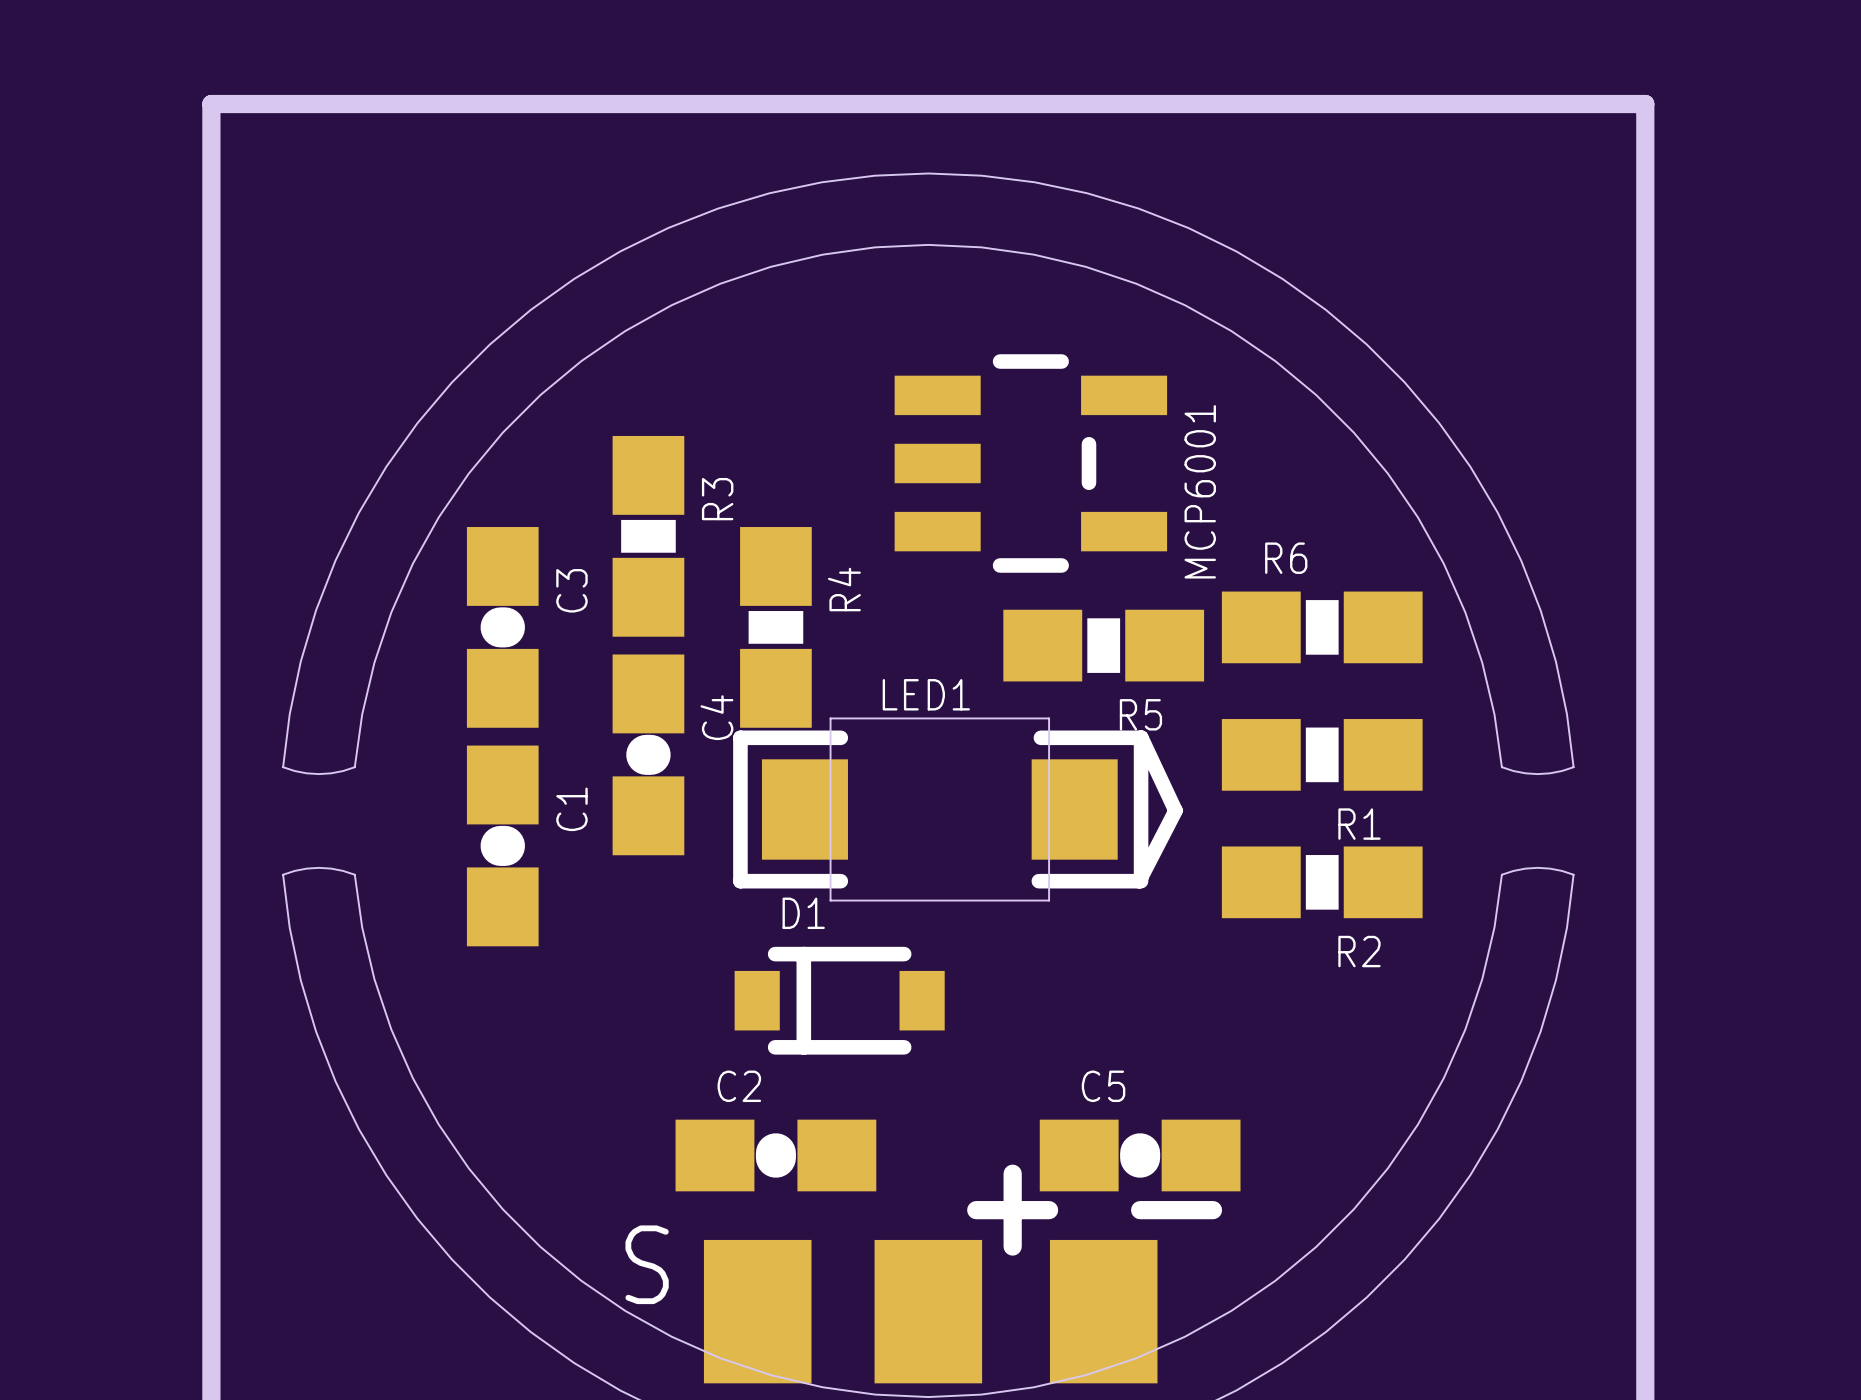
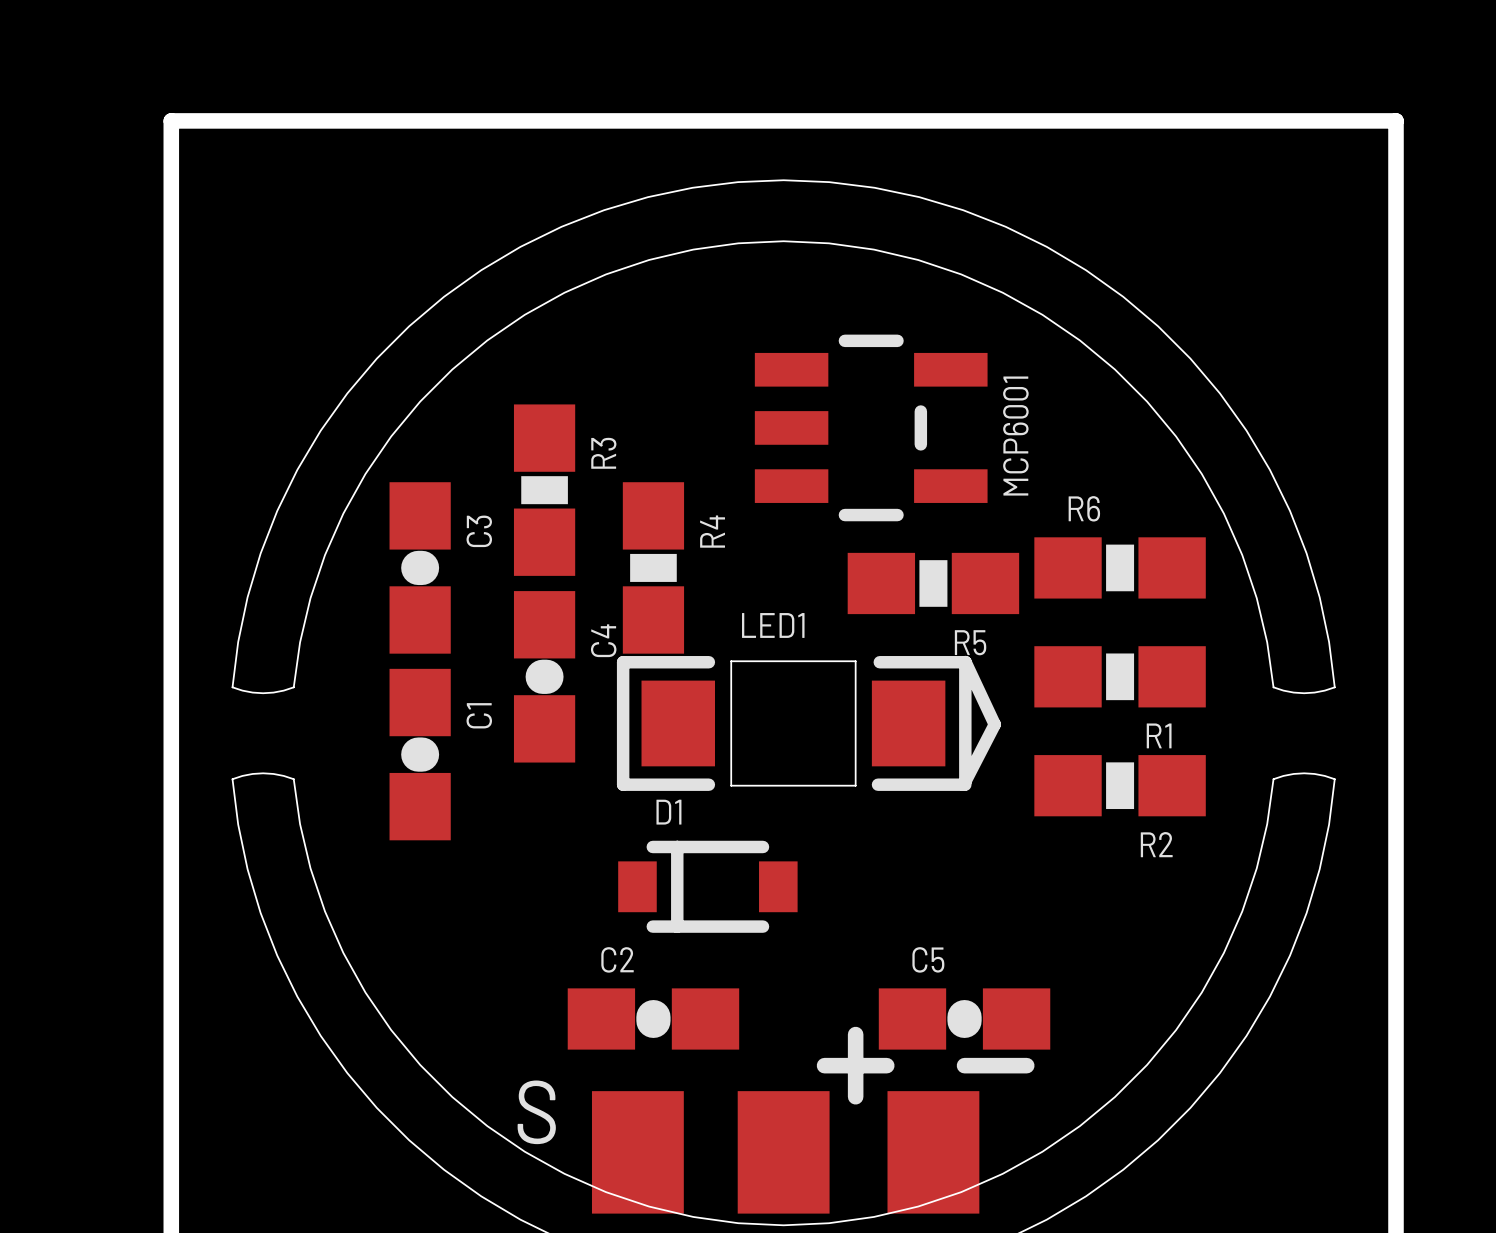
board edge: (830, 718) (830, 900) (1049, 900) (1049, 718) (830, 718) -> (731, 661) (731, 785) (855, 785) (855, 661) (731, 661)

